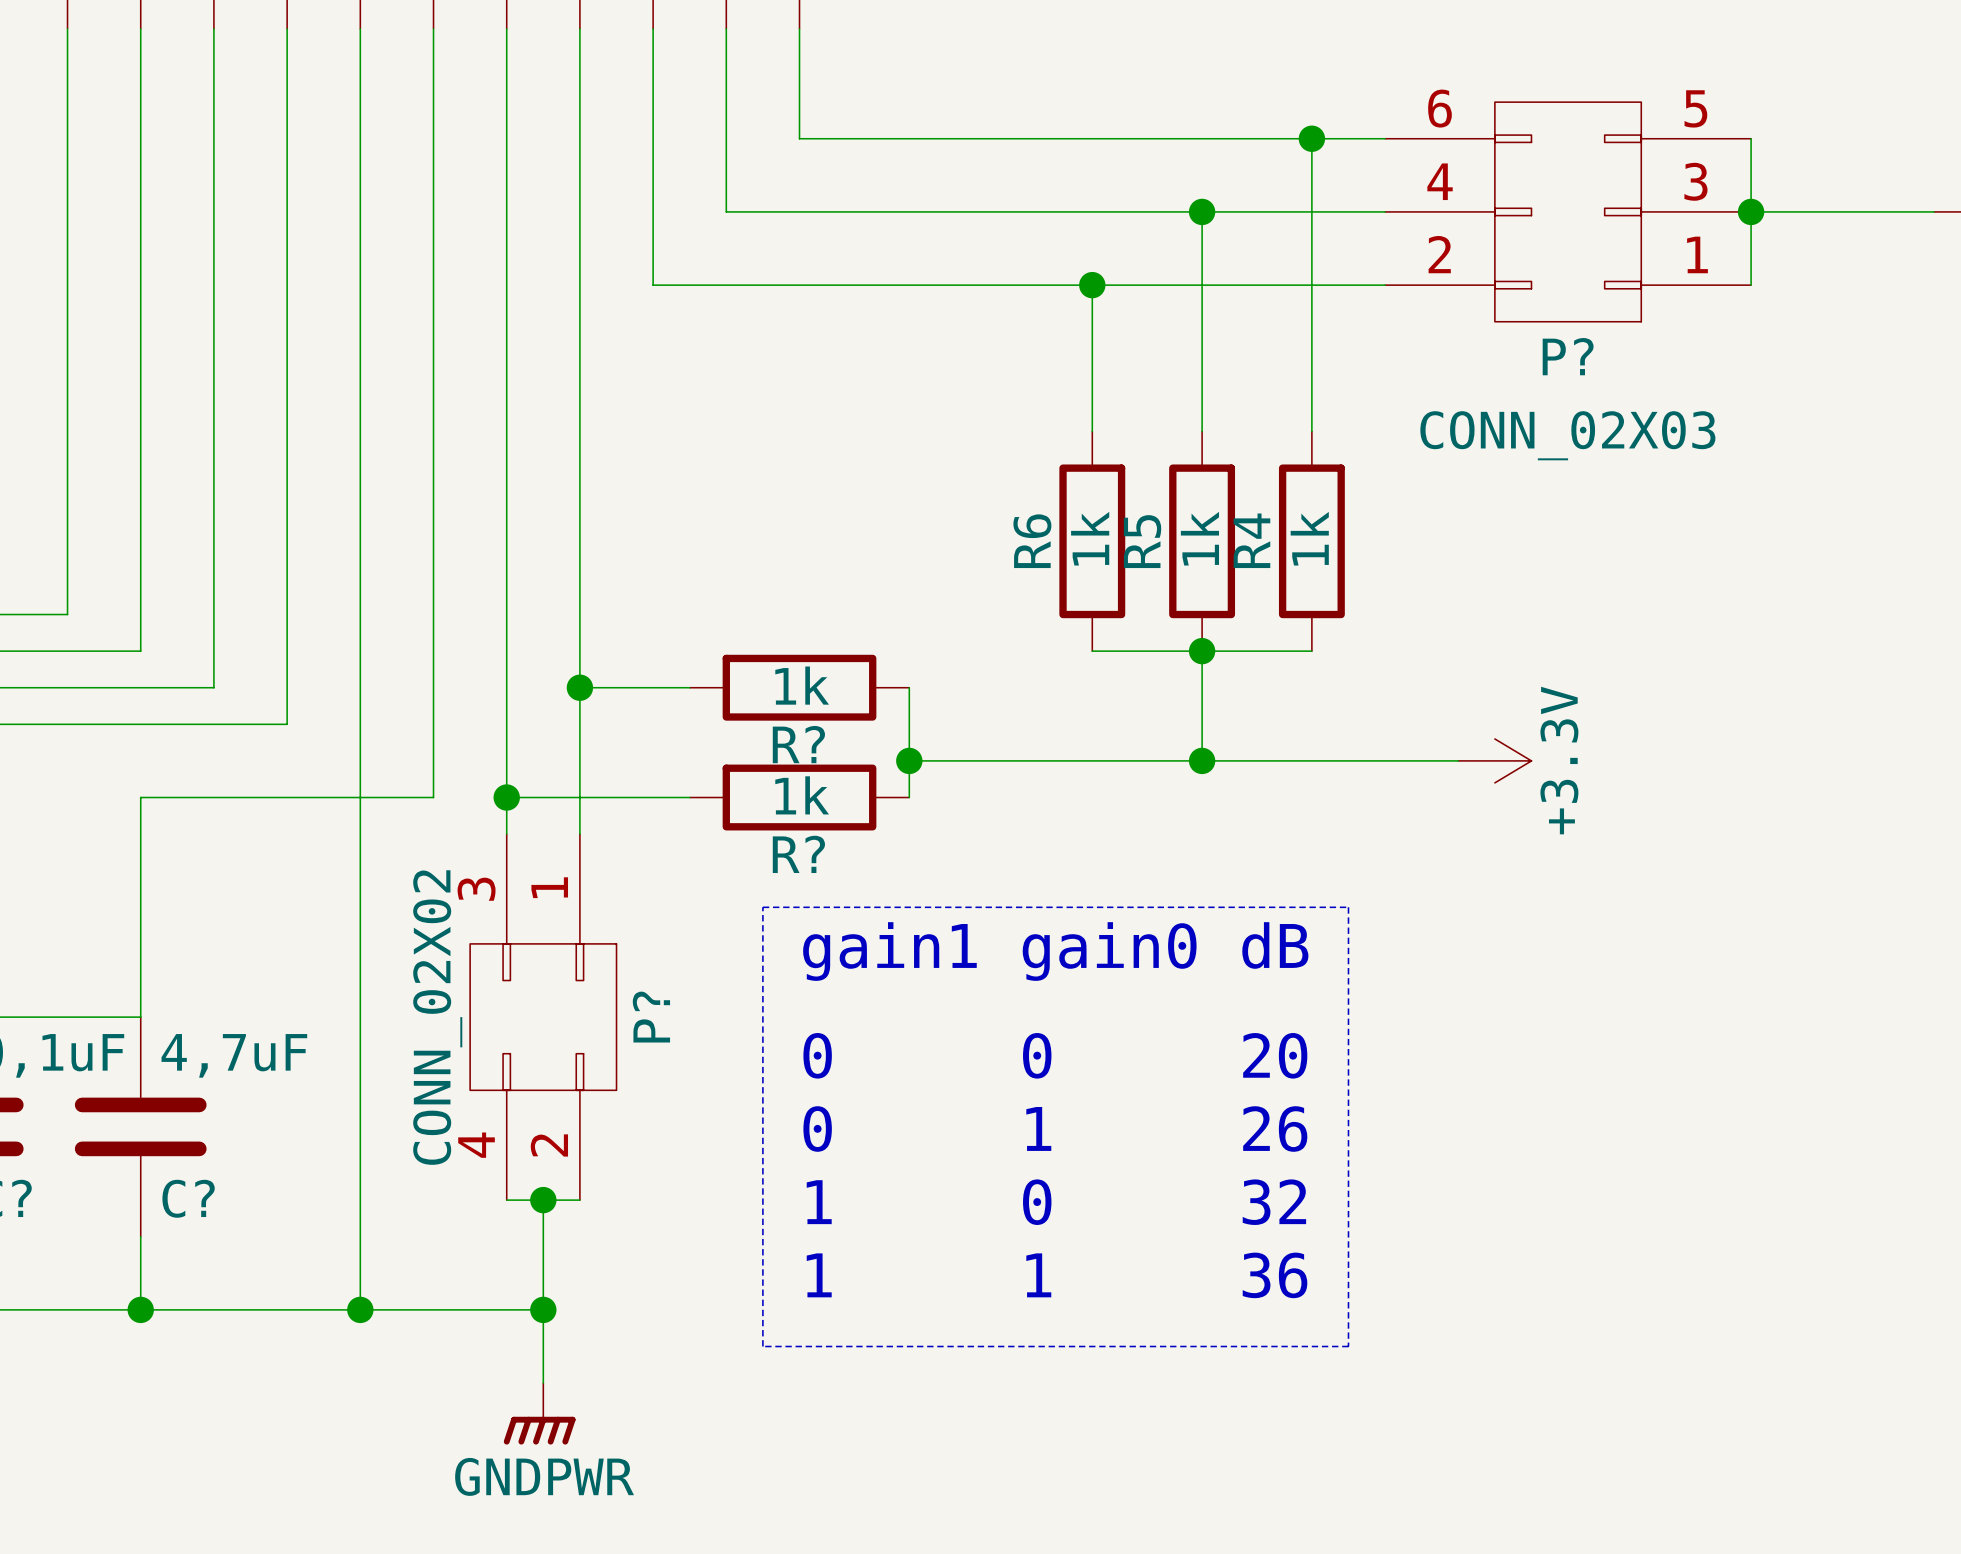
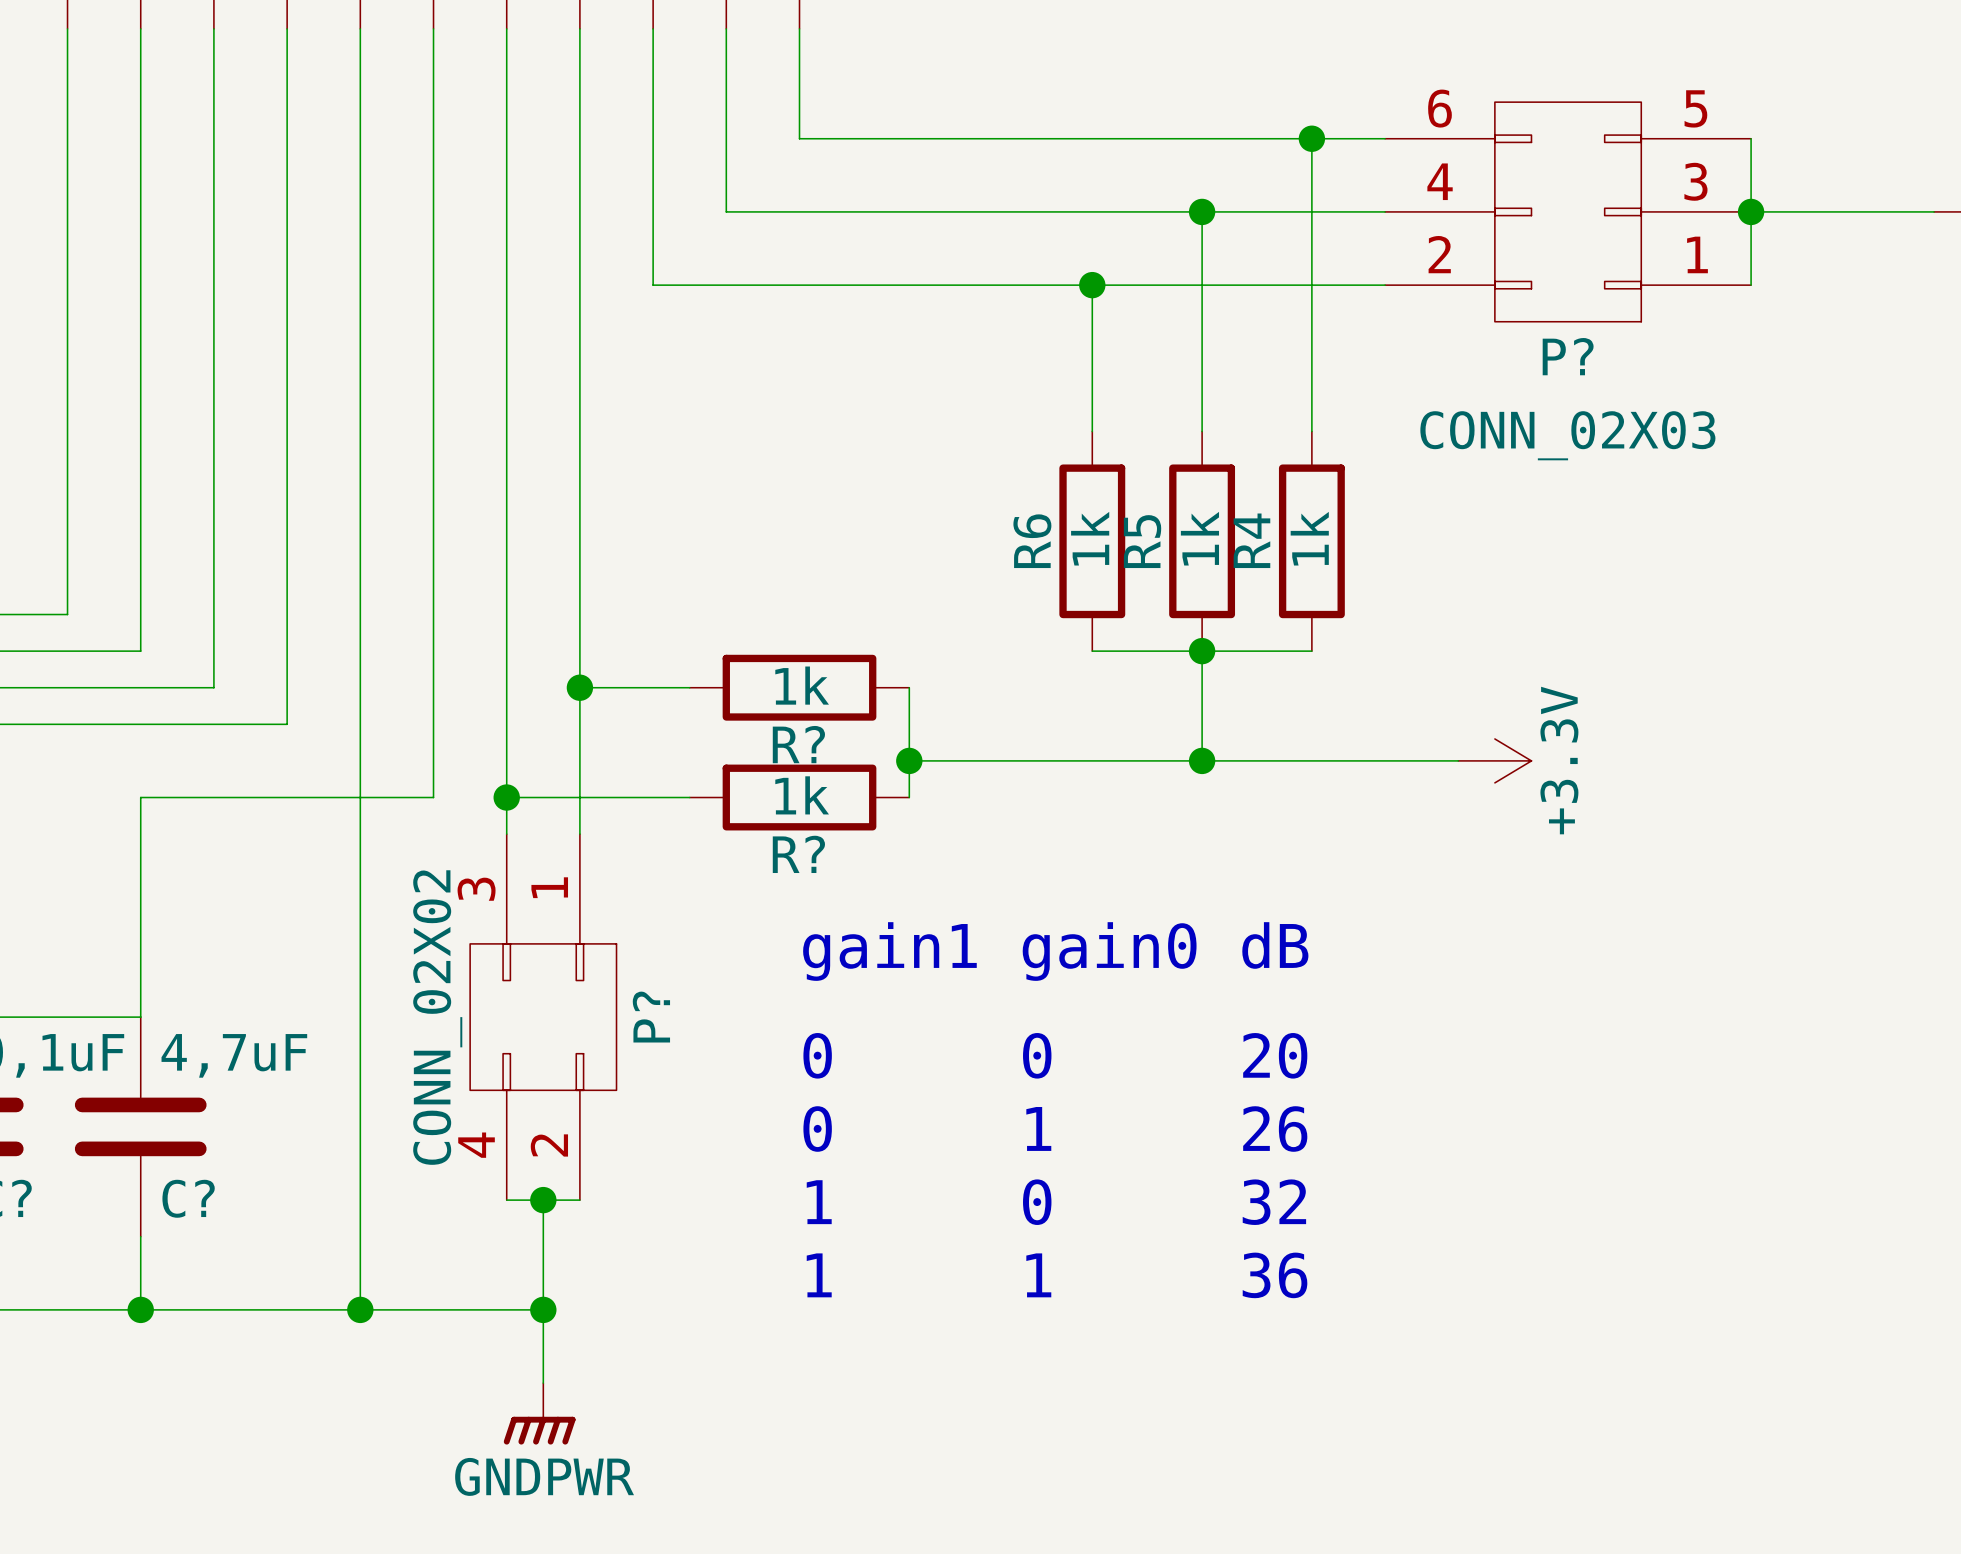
line: (762, 907) (1348, 907) (1348, 1346) (762, 1346) (762, 907) -> none

